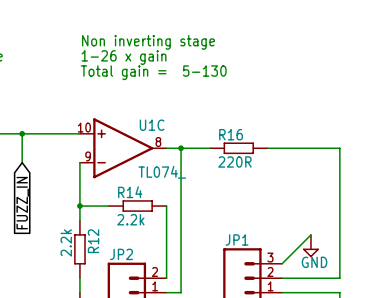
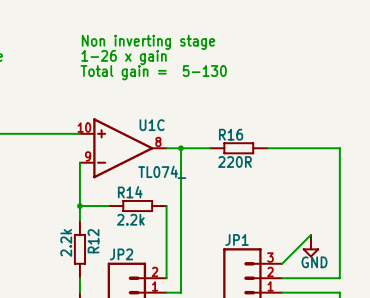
wire: (22, 133) (22, 162) -> none
junction: (22, 133) -> none
global label: FUZZ_IN (22, 203) -> none

